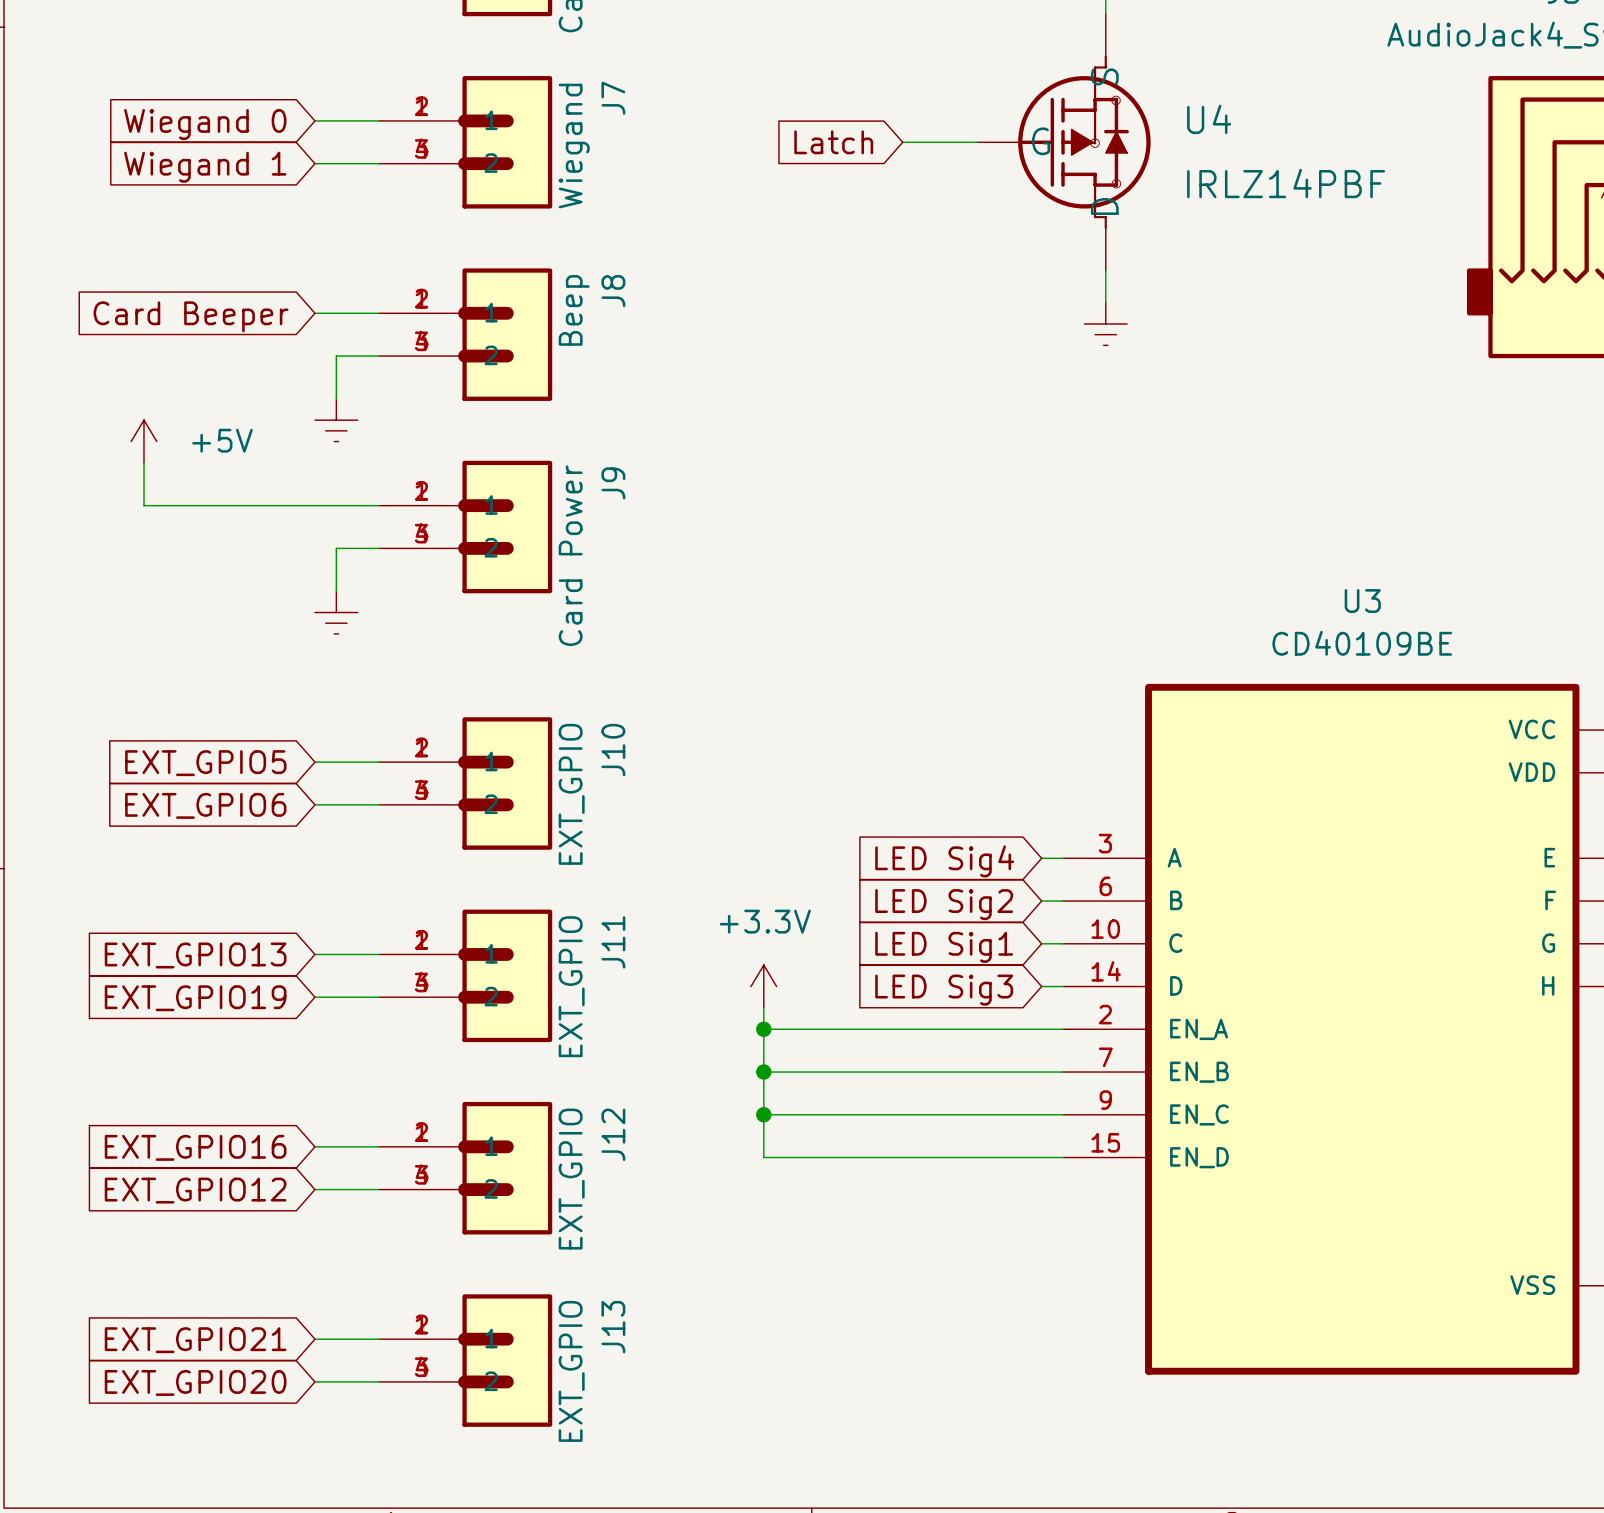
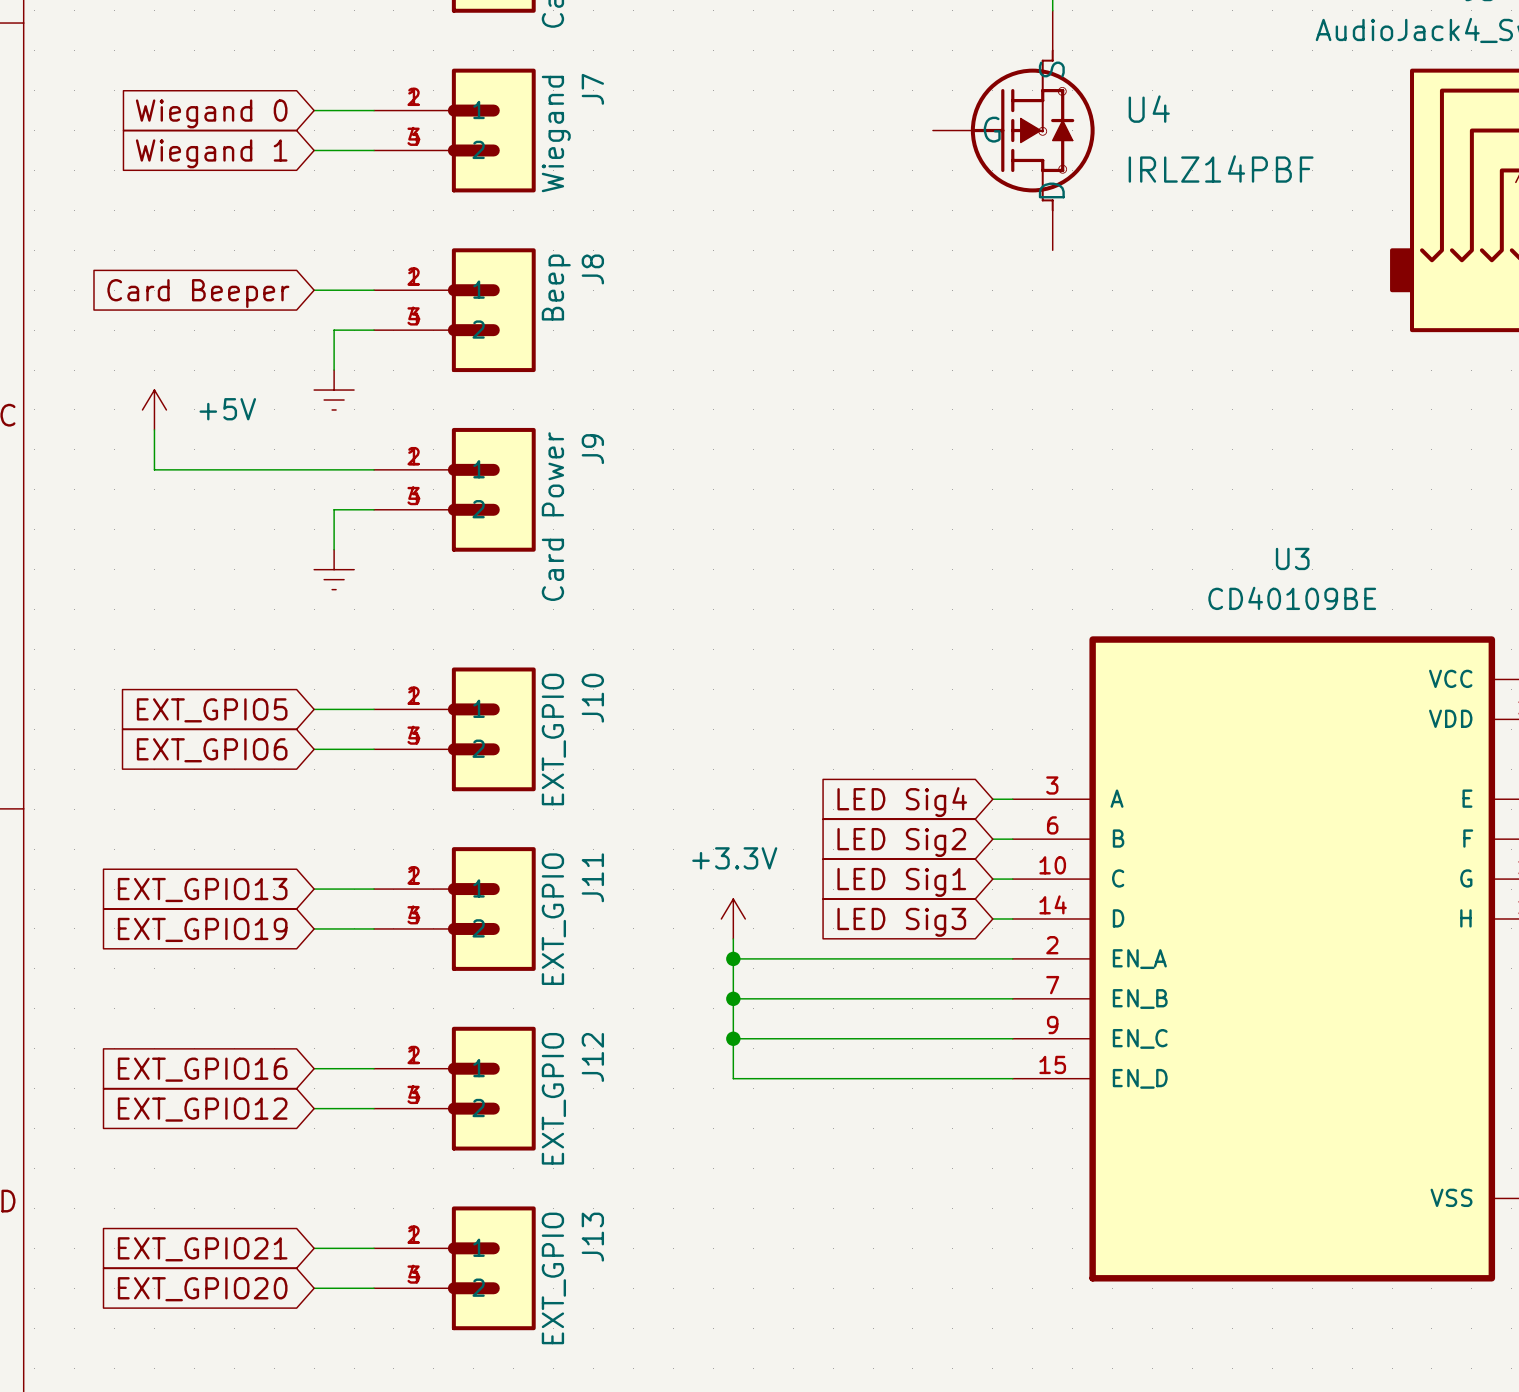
global label: Latch (833, 142) -> none
wire: (902, 142) (977, 142) -> none
wire: (1105, 270) (1105, 302) -> none
power symbol: (1105, 323) -> none

